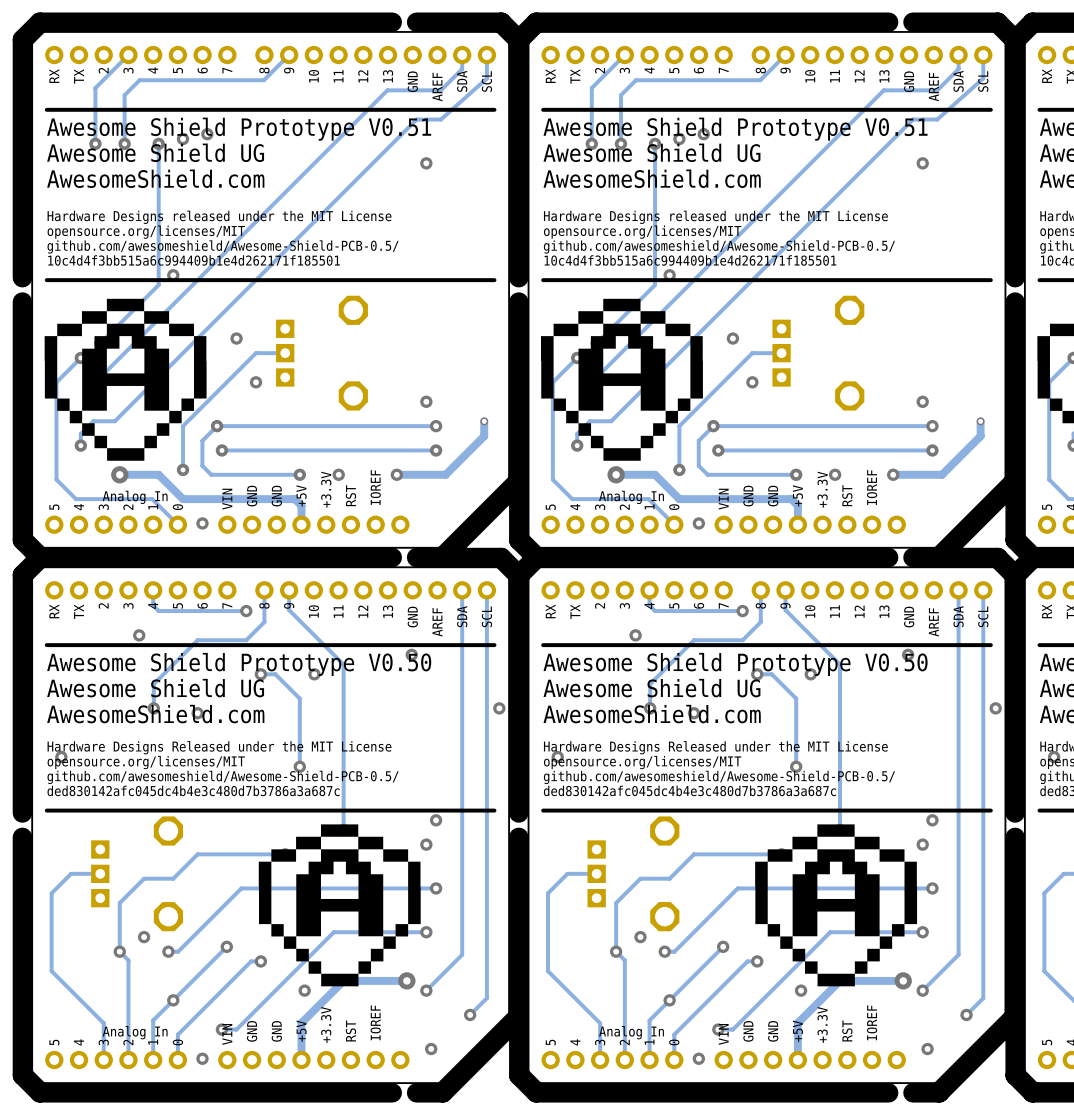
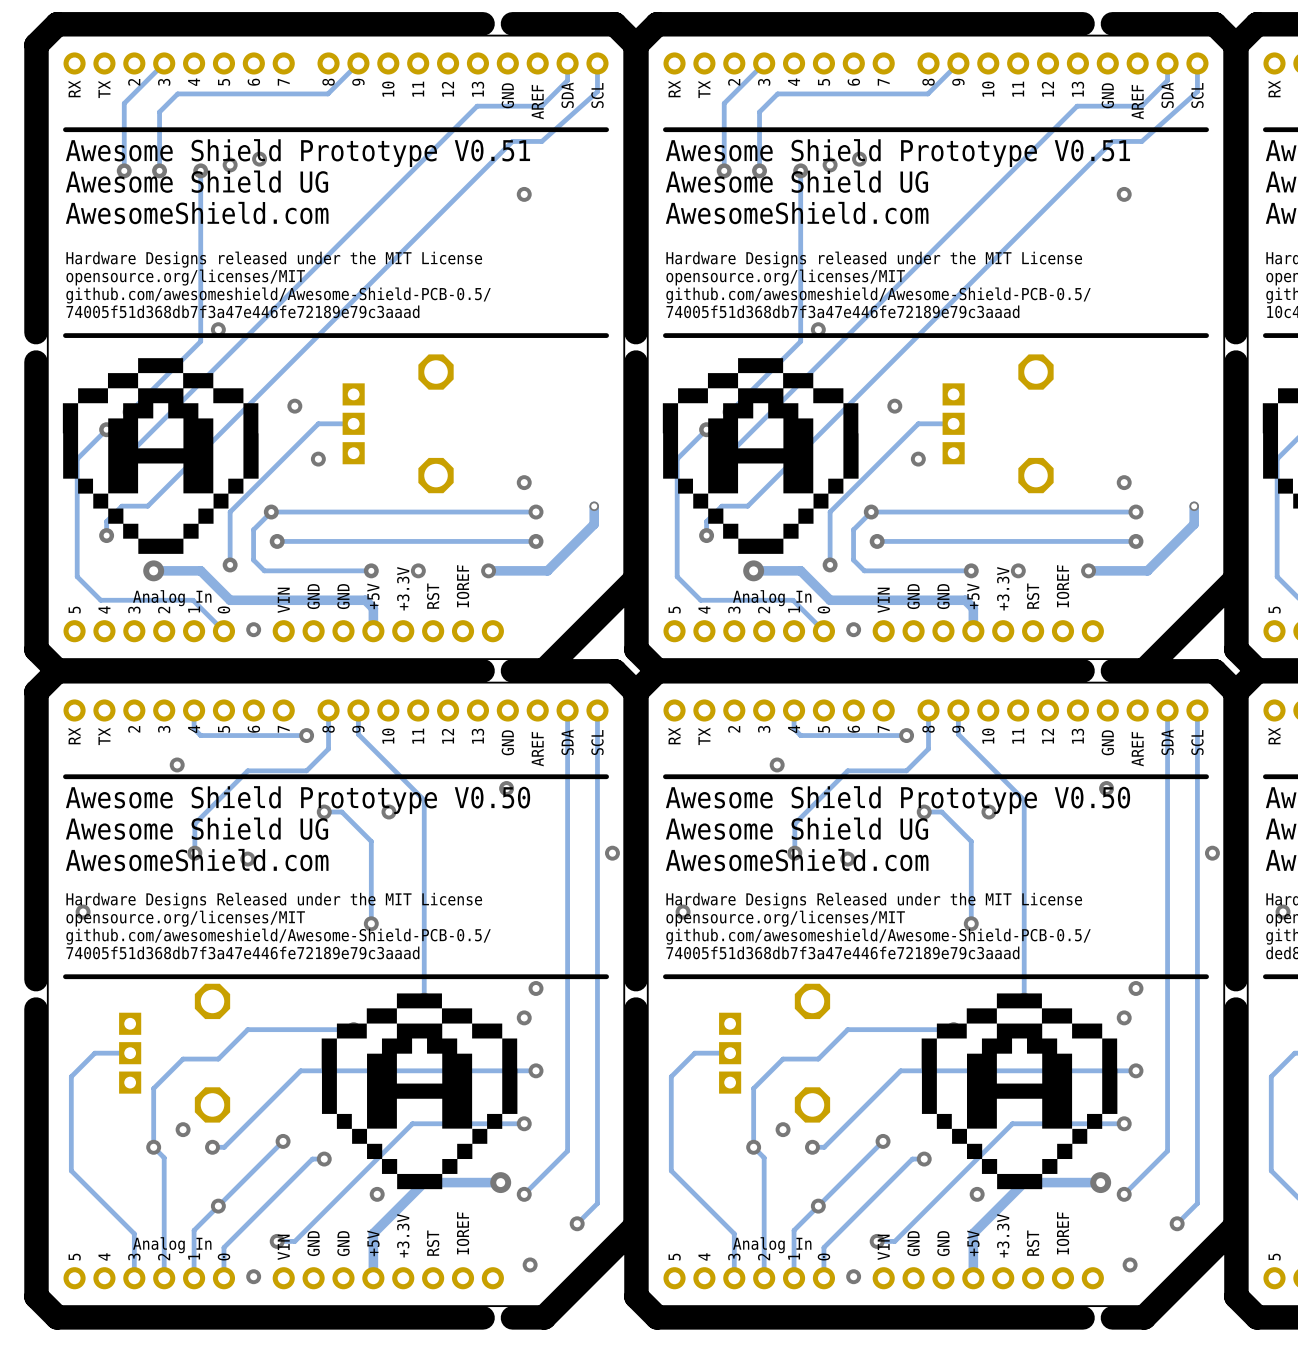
text: 10c4d4f3bb515a6c994409b1e4d262171f185501 (194, 260) -> 74005f51d368db7f3a47e446fe72189e79c3aaad (242, 311)
text: 10c4d4f3bb515a6c994409b1e4d262171f185501 (690, 260) -> 74005f51d368db7f3a47e446fe72189e79c3aaad (842, 311)
text: ded830142afc045dc4b4e3c480d7b3786a3a687c (193, 790) -> 74005f51d368db7f3a47e446fe72189e79c3aaad (242, 952)
text: ded830142afc045dc4b4e3c480d7b3786a3a687c (689, 790) -> 74005f51d368db7f3a47e446fe72189e79c3aaad (842, 952)

